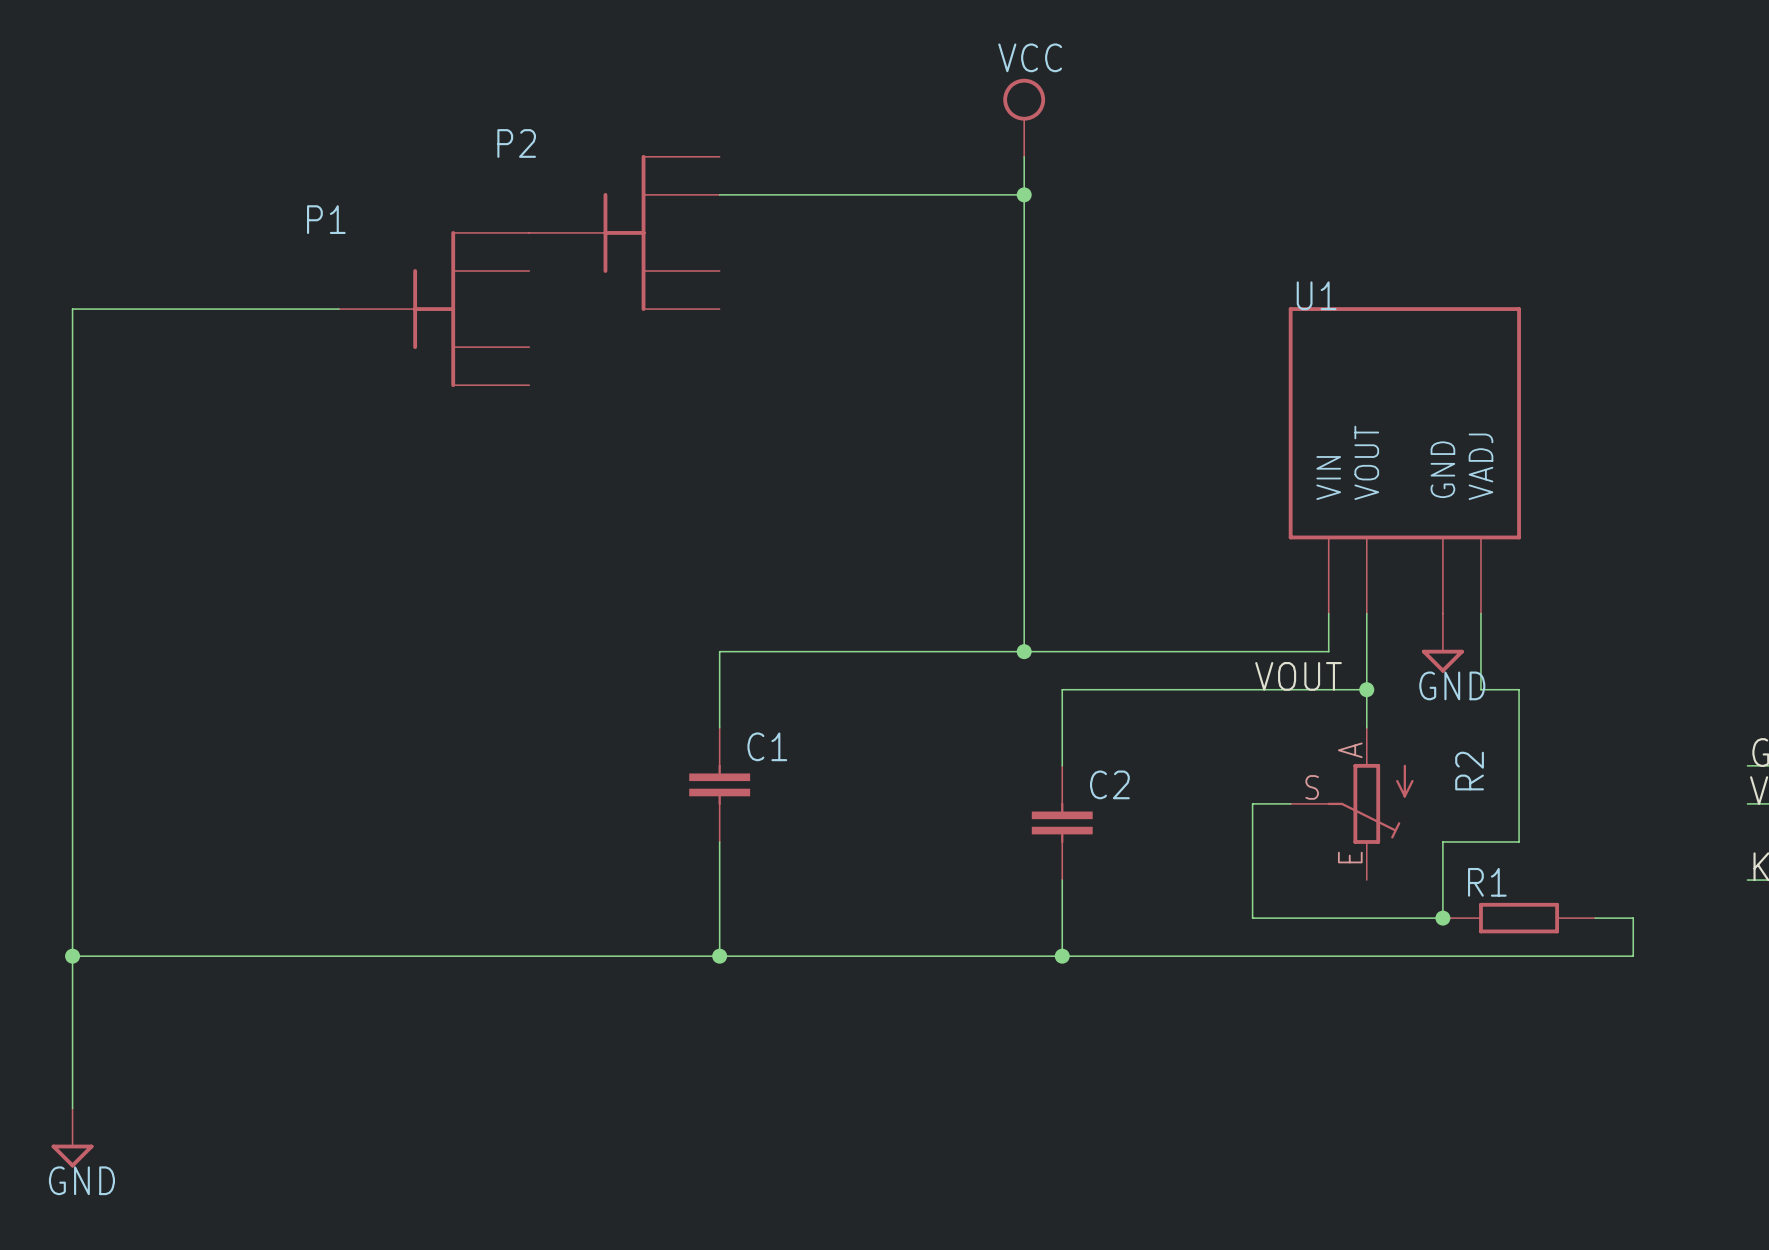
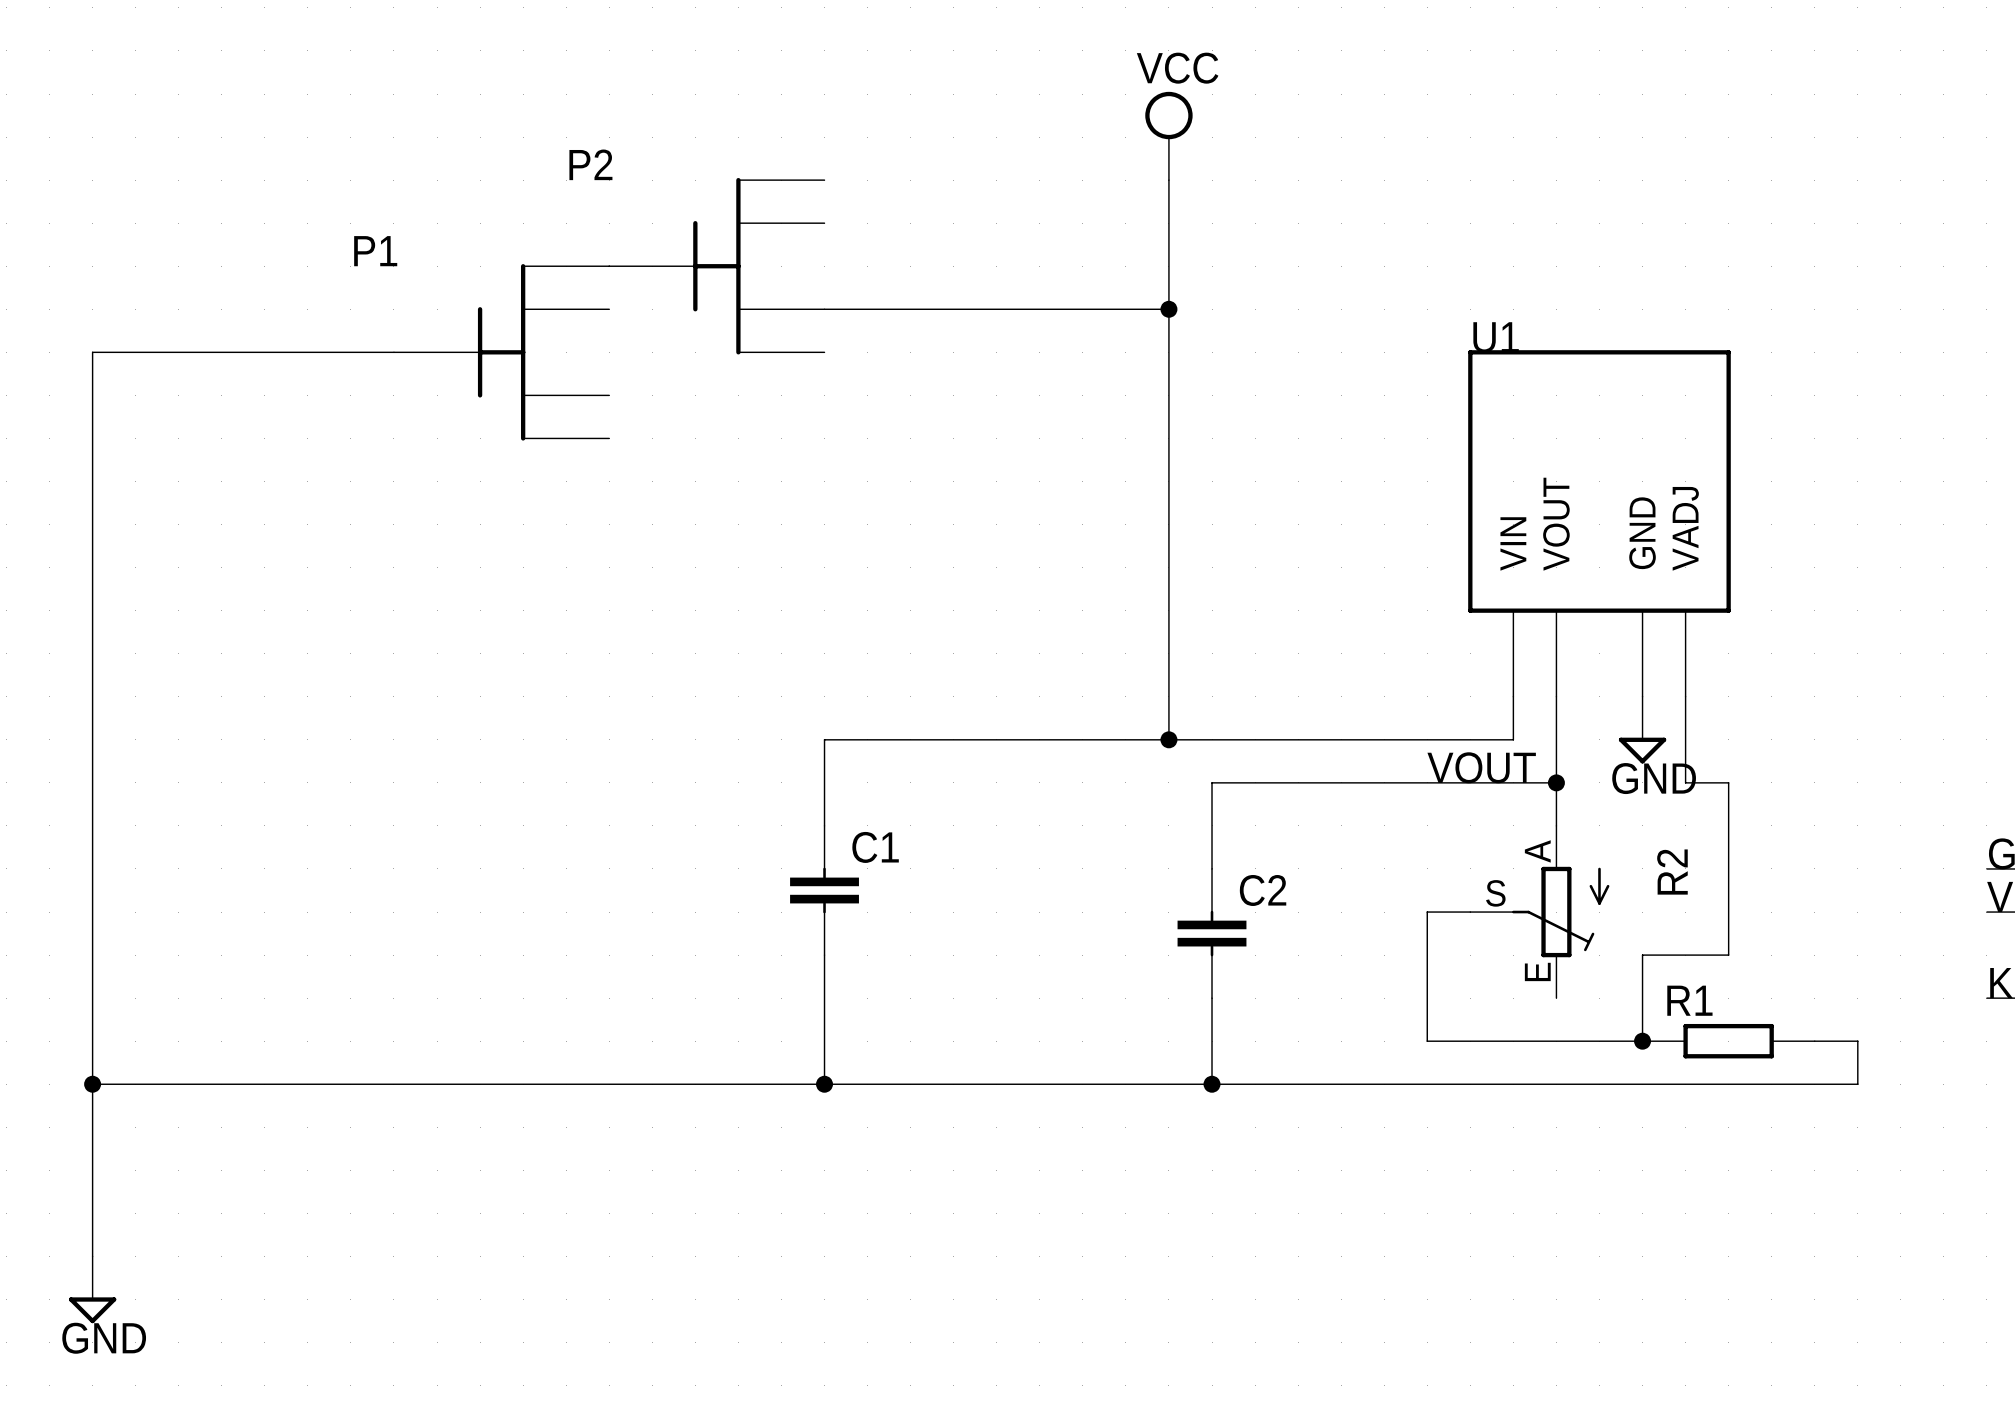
wire: (719, 194) (1024, 194) -> (824, 309) (1168, 309)
junction position: (1024, 194) -> (1168, 309)

